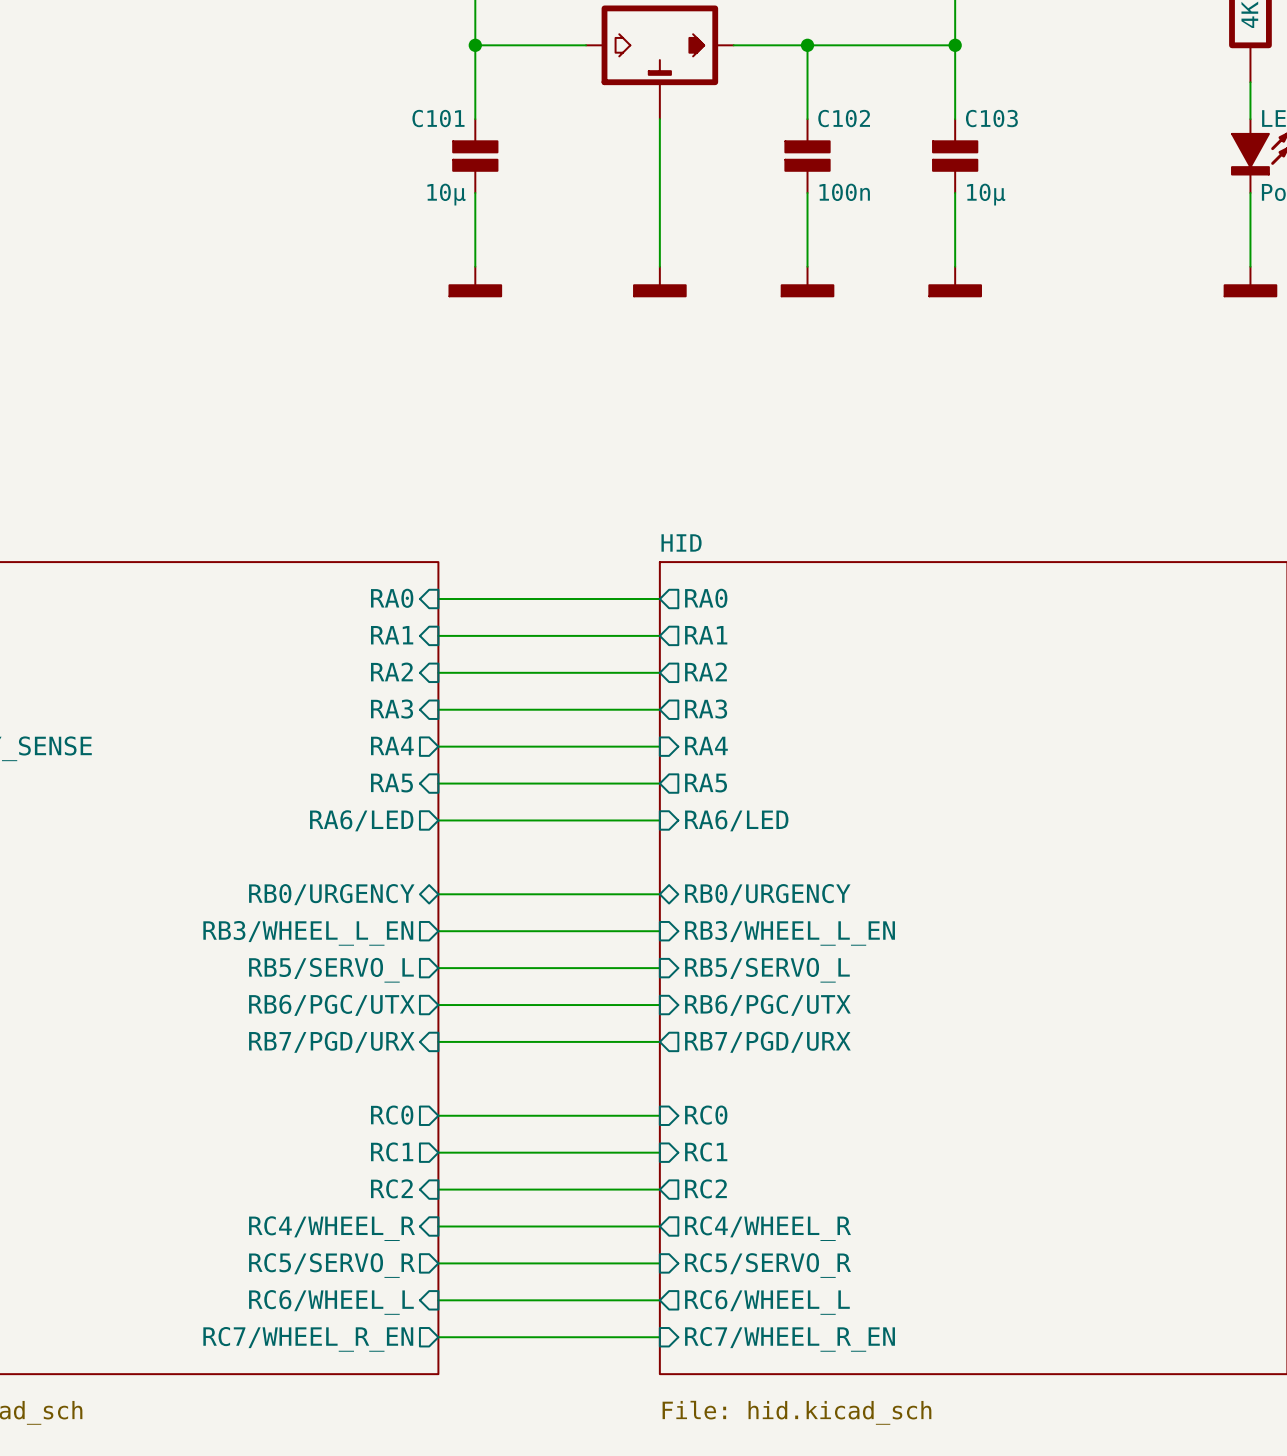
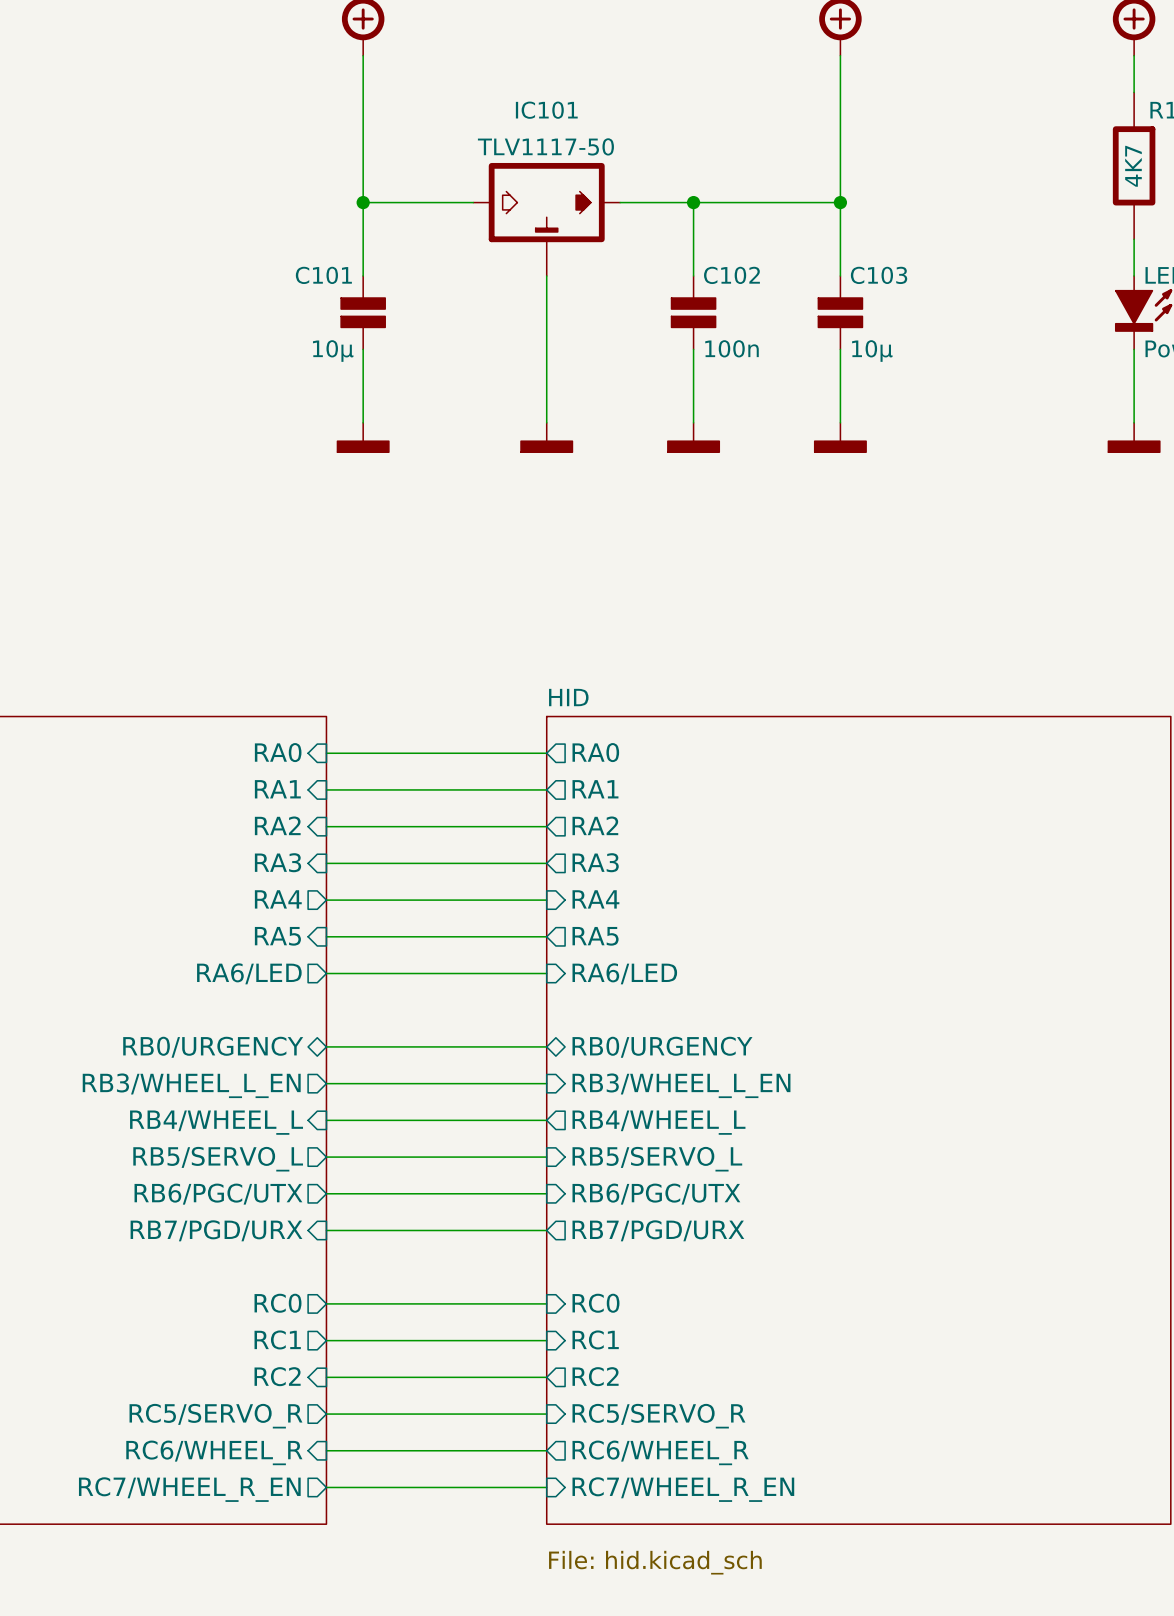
sheet pin shape: output (331, 970) -> input (216, 1122)
sheet pin: RB5/SERVO_L (331, 970) -> RB4/WHEEL_L (216, 1122)
sheet pin shape: input (767, 970) -> output (658, 1122)
sheet pin: RB5/SERVO_L (767, 970) -> RB4/WHEEL_L (658, 1122)
sheet pin: RB6/PGC/UTX (331, 1005) -> RB5/SERVO_L (218, 1159)
sheet pin: RB6/PGC/UTX (767, 1005) -> RB5/SERVO_L (657, 1159)
sheet pin shape: input (331, 1042) -> output (218, 1194)
sheet pin: RB7/PGD/URX (331, 1042) -> RB6/PGC/UTX (218, 1194)
sheet pin shape: output (767, 1042) -> input (656, 1194)
sheet pin: RB7/PGD/URX (767, 1042) -> RB6/PGC/UTX (656, 1194)
sheet pin: none -> RB7/PGD/URX (216, 1230)
sheet pin: none -> RB7/PGD/URX (658, 1230)
sheet pin: RC0 (392, 1115) -> none
wire: (438, 1115) (659, 1115) -> (326, 1230) (546, 1230)
sheet pin: RC0 (706, 1115) -> none
sheet pin: RC1 (392, 1151) -> RC0 (277, 1303)
sheet pin: RC1 (706, 1151) -> RC0 (595, 1303)
sheet pin shape: input (391, 1188) -> output (277, 1339)
sheet pin: RC2 (391, 1188) -> RC1 (277, 1339)
sheet pin shape: output (705, 1188) -> input (595, 1339)
sheet pin: RC2 (705, 1188) -> RC1 (595, 1339)
sheet pin: RC4/WHEEL_R (332, 1228) -> RC2 (277, 1376)
sheet pin: RC4/WHEEL_R (768, 1228) -> RC2 (595, 1376)
sheet pin: RC6/WHEEL_L (331, 1302) -> RC6/WHEEL_R (214, 1452)
sheet pin: RC6/WHEEL_L (767, 1302) -> RC6/WHEEL_R (660, 1452)

